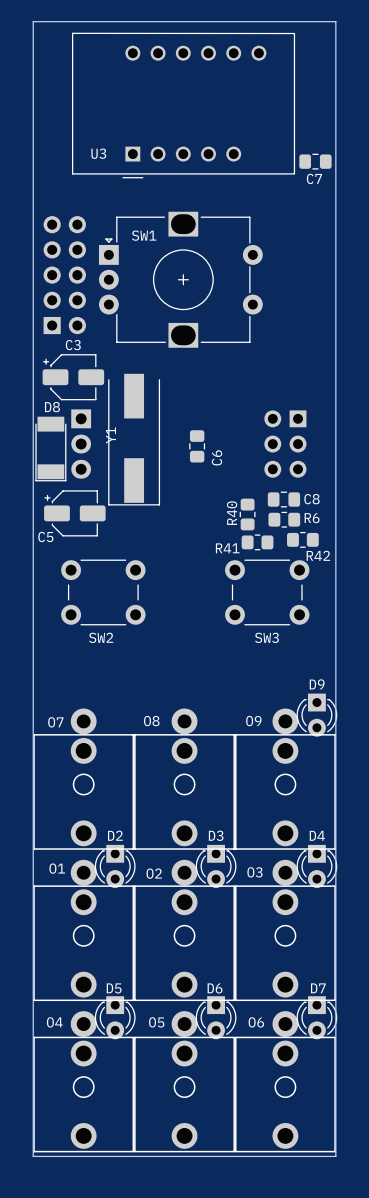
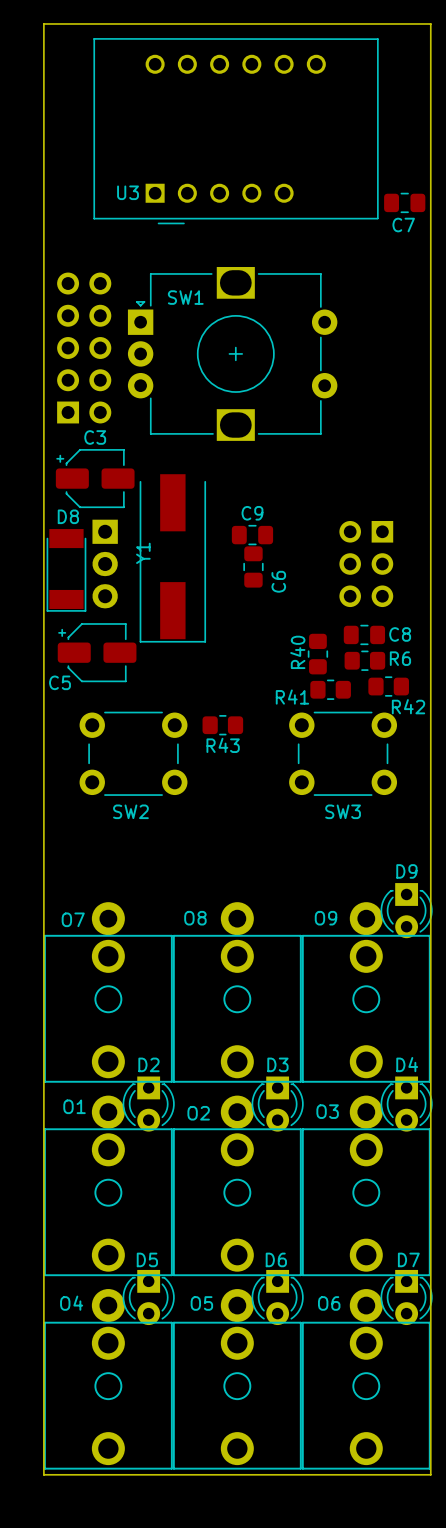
U3 footprint: [72, 32, 296, 179] -> [93, 38, 379, 225]
C9: none -> (252, 535)
R43: none -> (222, 725)

